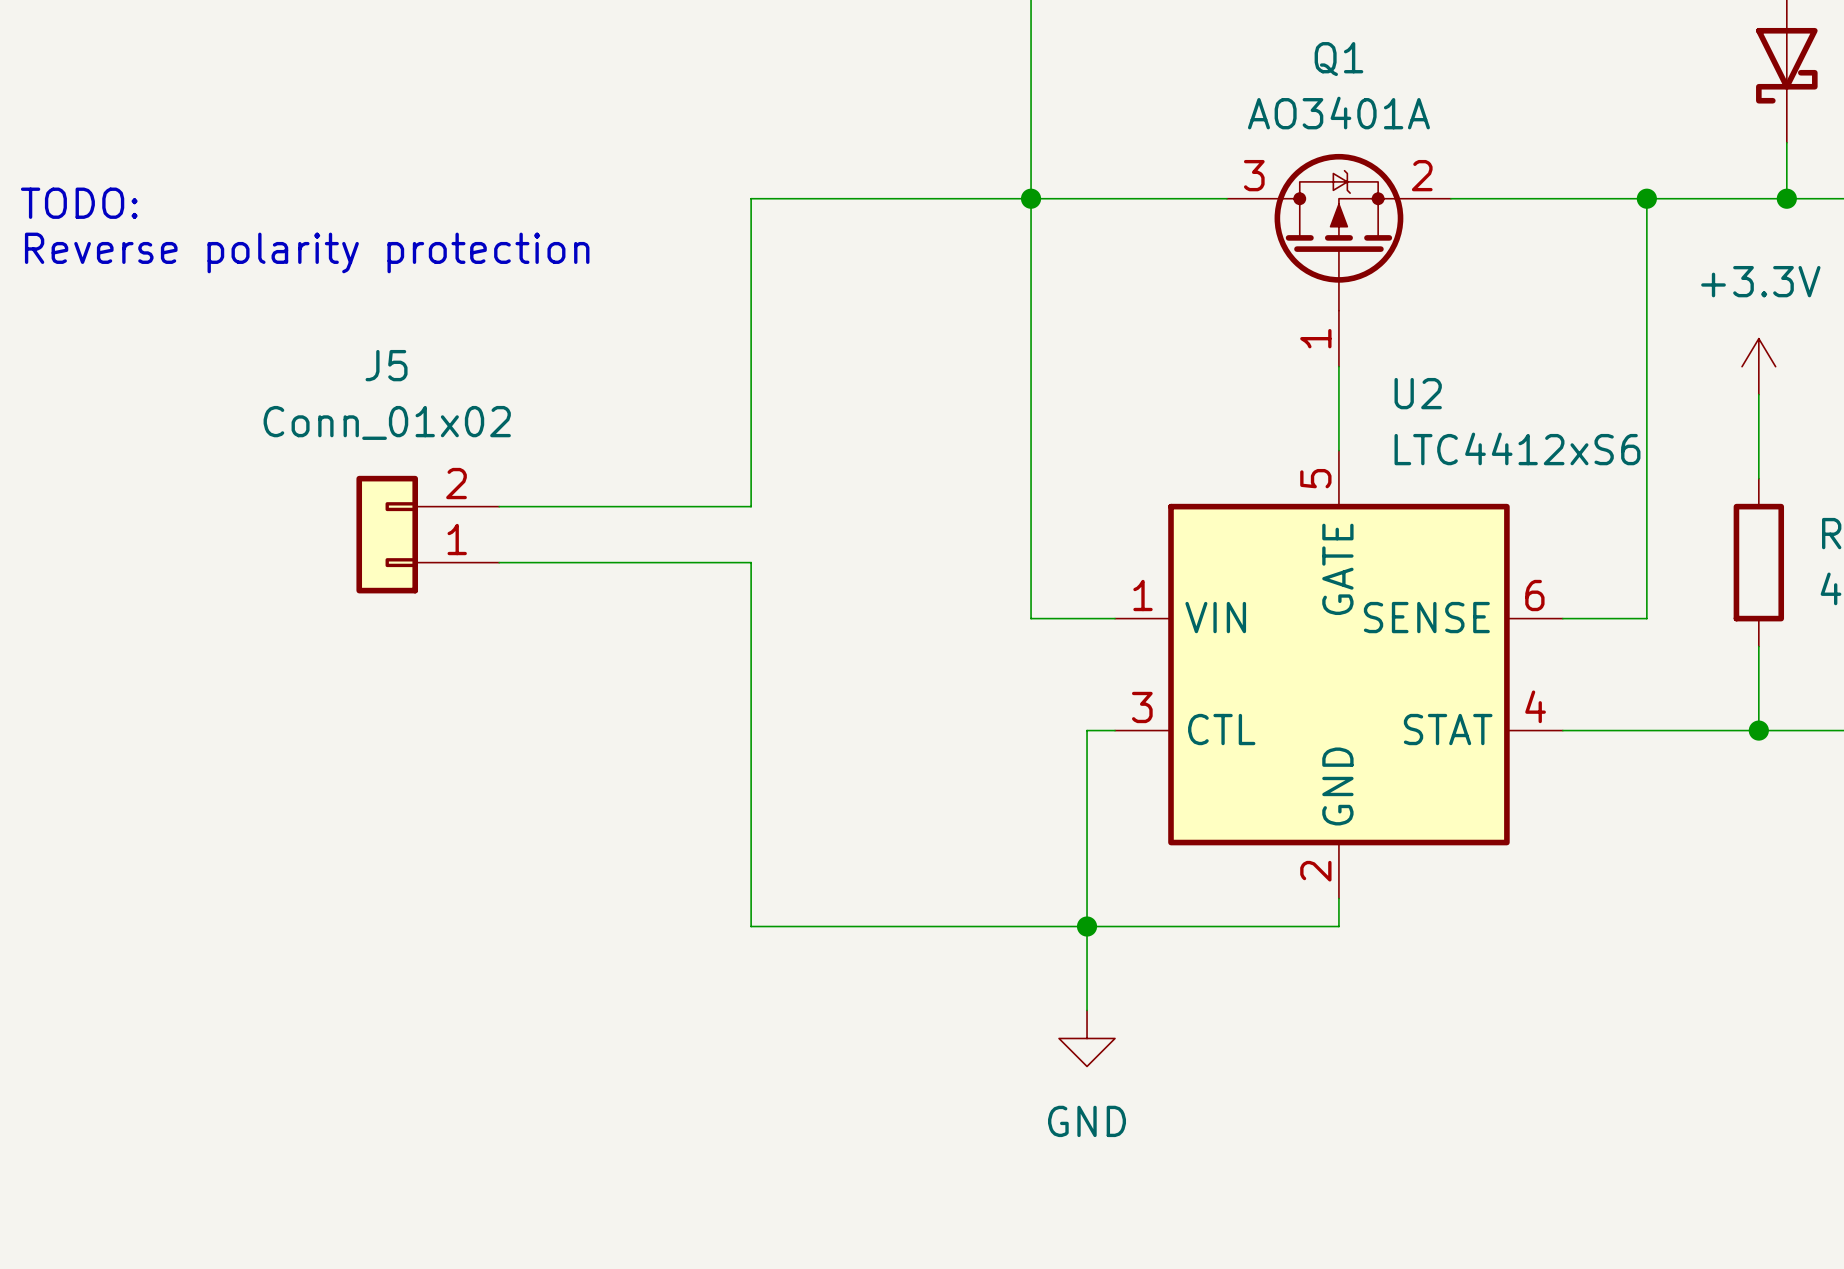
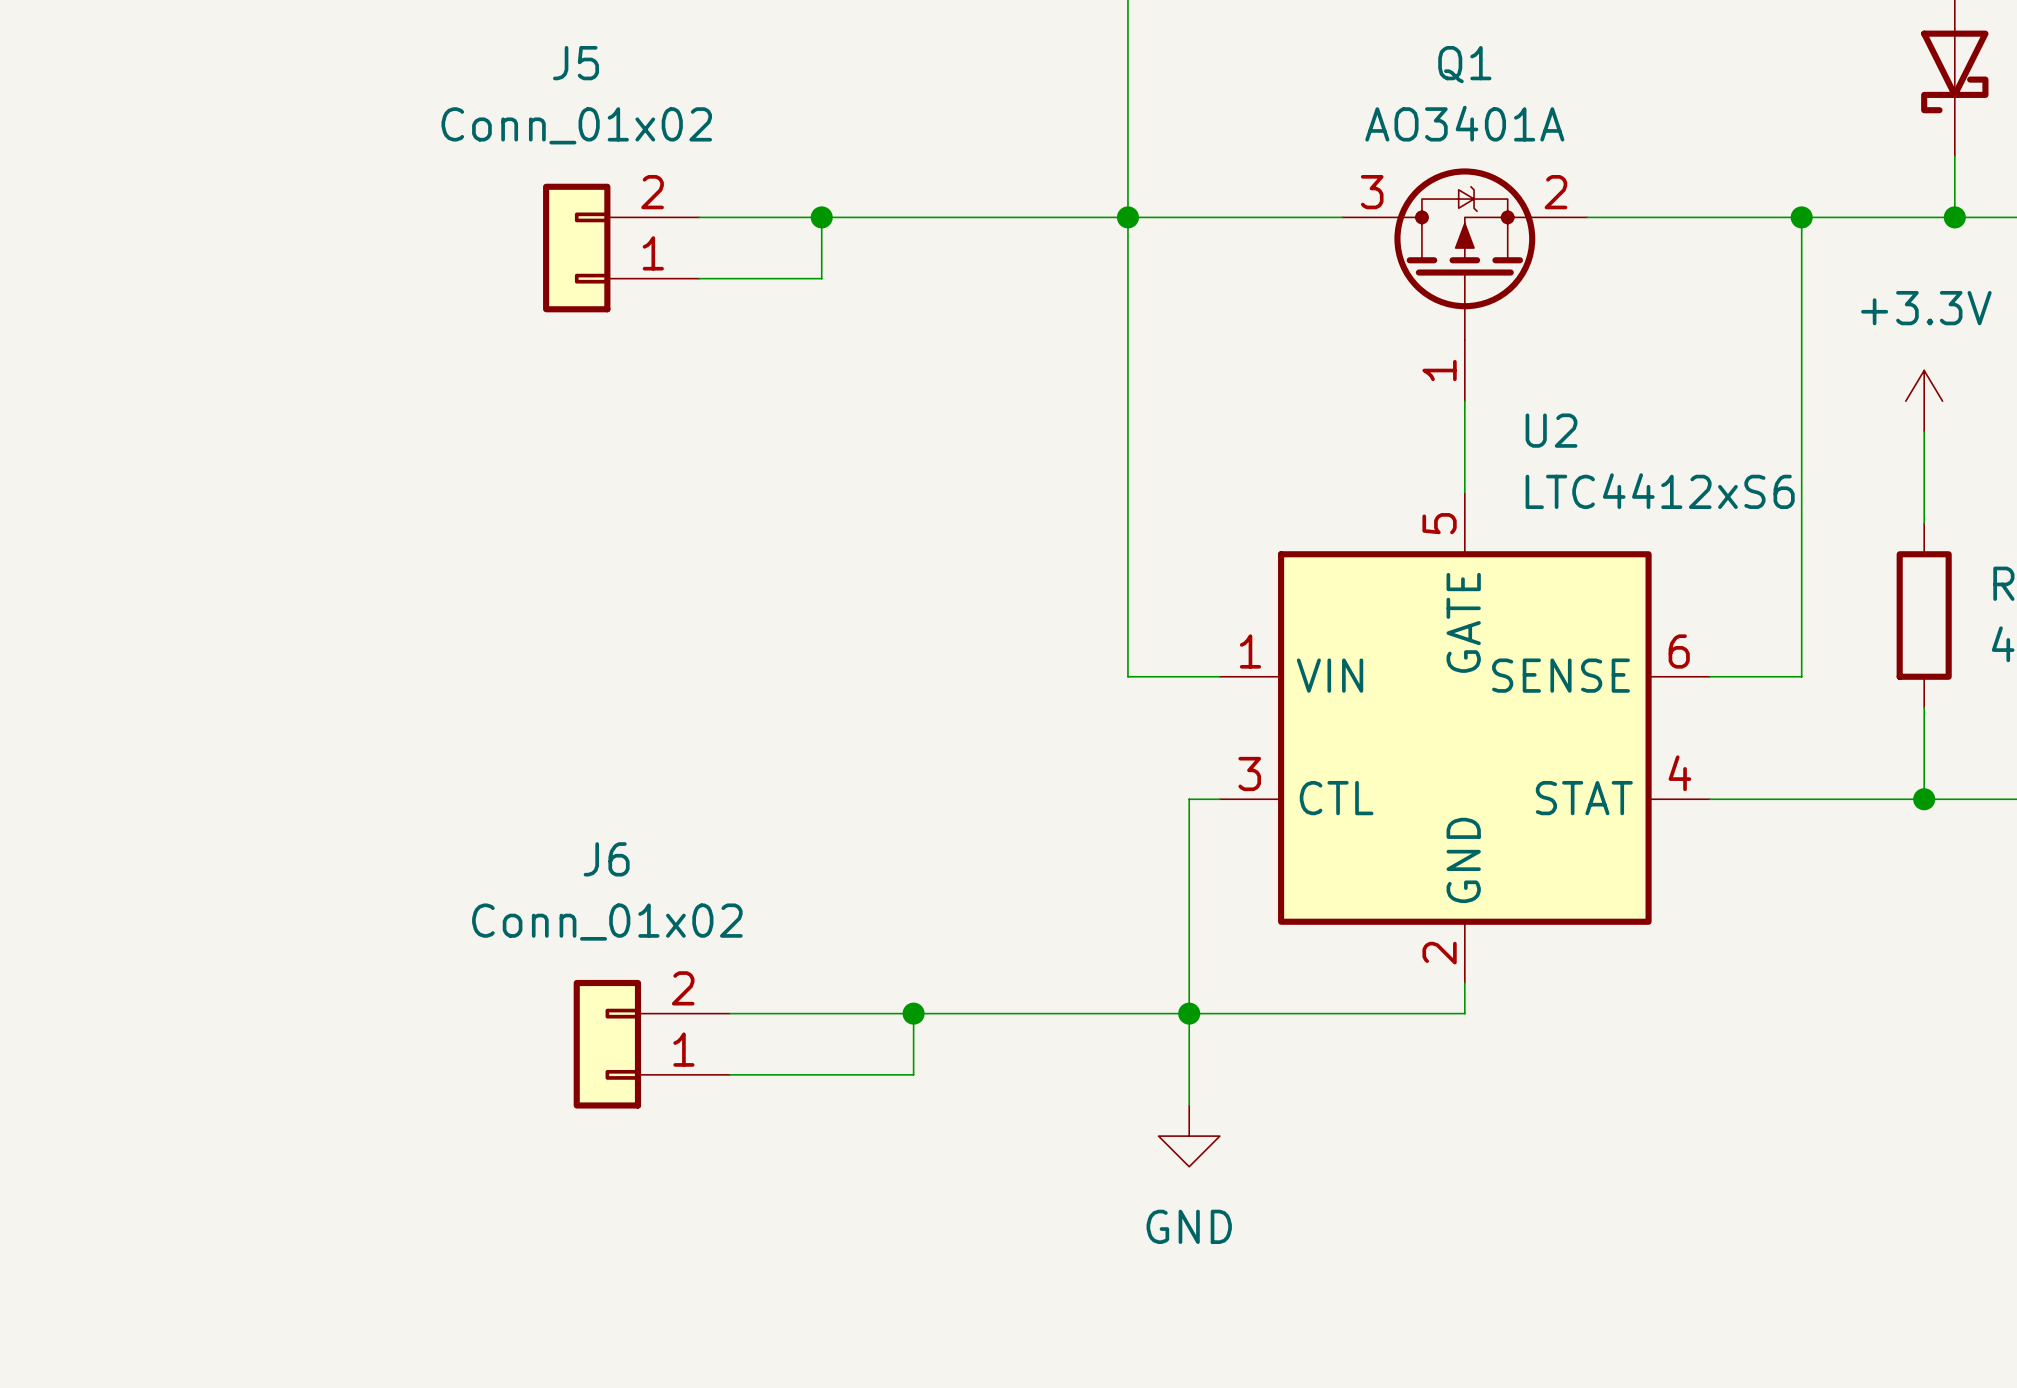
wire: none -> (699, 217) (821, 217)
junction: none -> (821, 217)
text: TODO: (79, 203) -> none
text: Reverse polarity protection (307, 252) -> none
wire: (751, 254) (751, 506) (499, 506) -> (821, 278) (699, 278)
J5 position: (427, 534) -> (621, 248)
wire: (499, 562) (751, 562) (751, 926) -> (729, 1013) (821, 1013)
wire: none -> (913, 1013) (913, 1074) (729, 1074)
junction: none -> (913, 1013)
J6: none -> Conn_01x02 (651, 1044)

